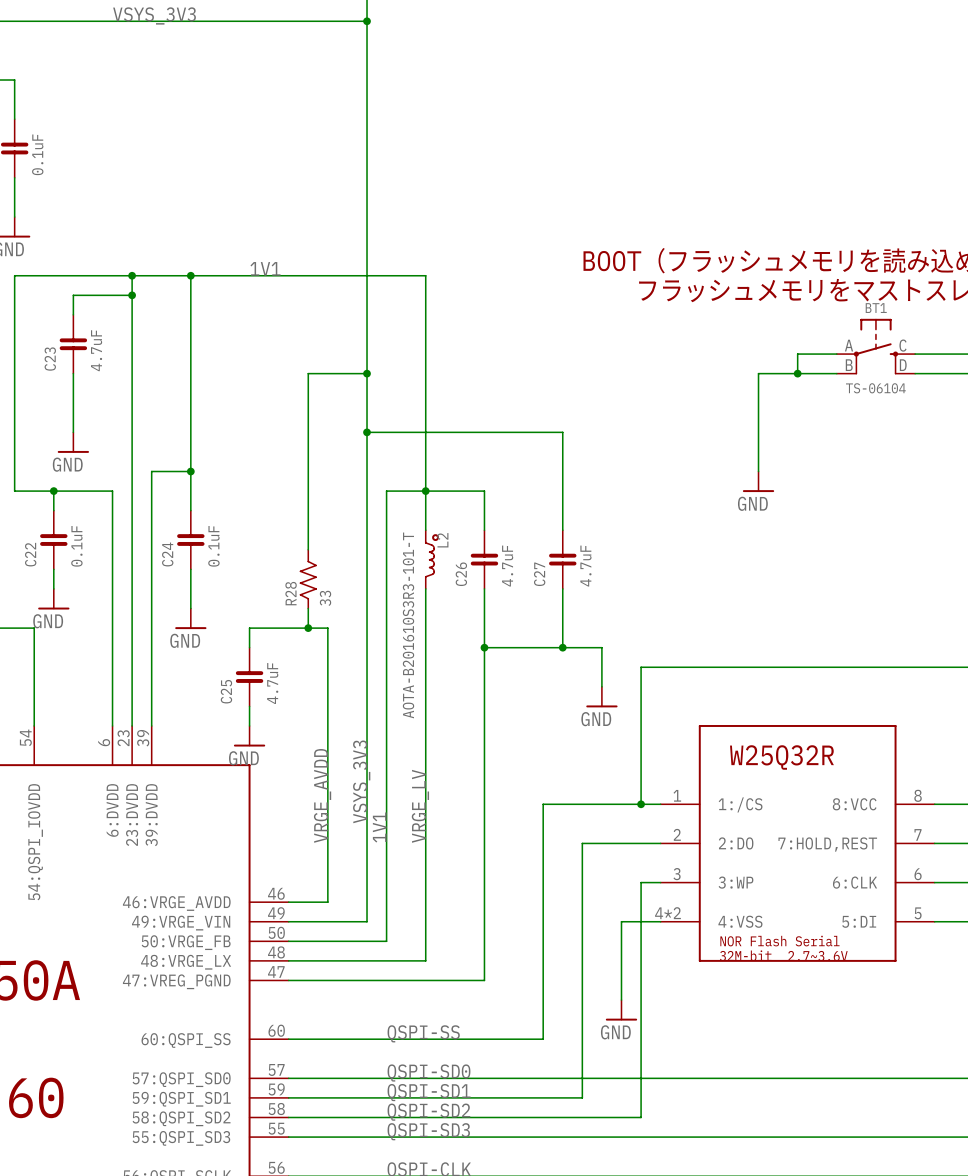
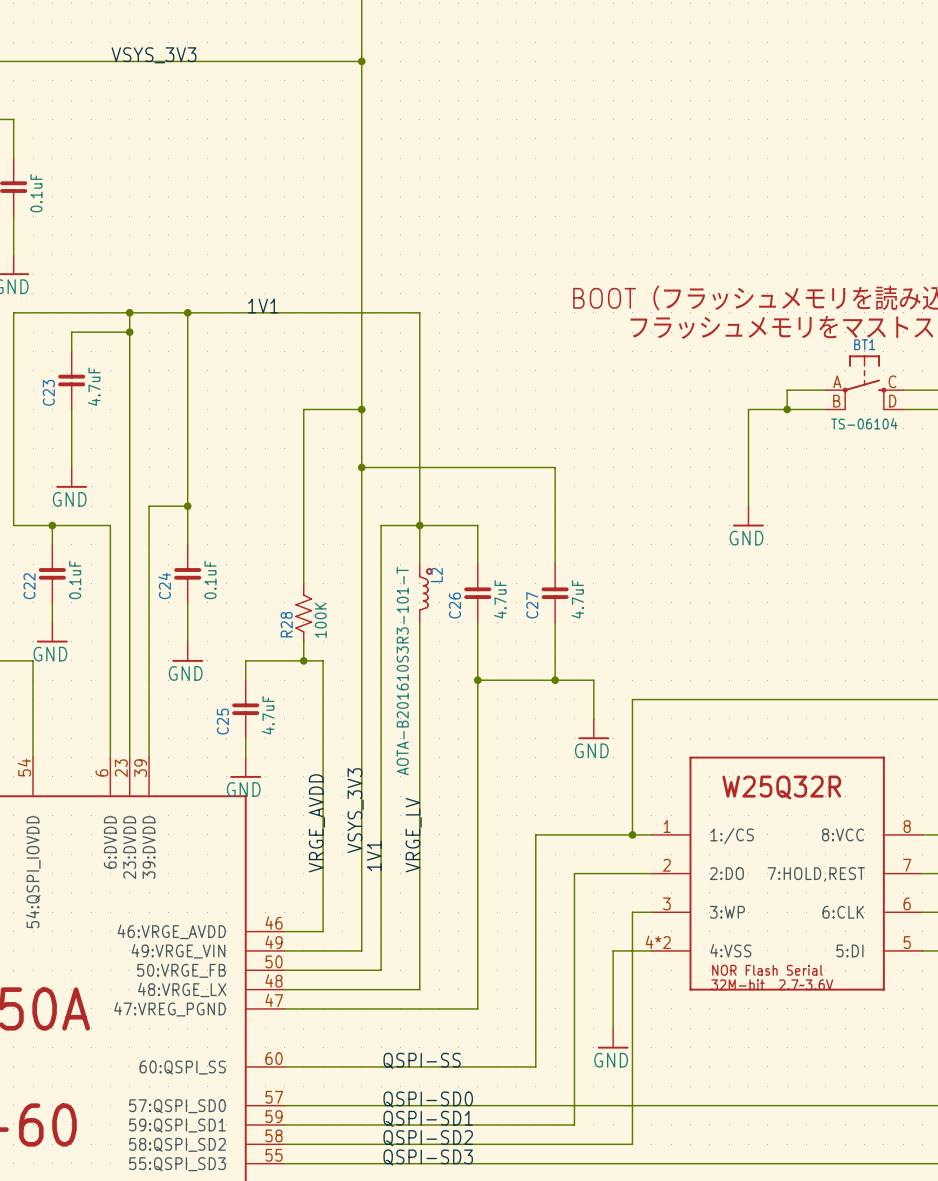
R28 value: 33 (325, 598) -> 100K (320, 620)

